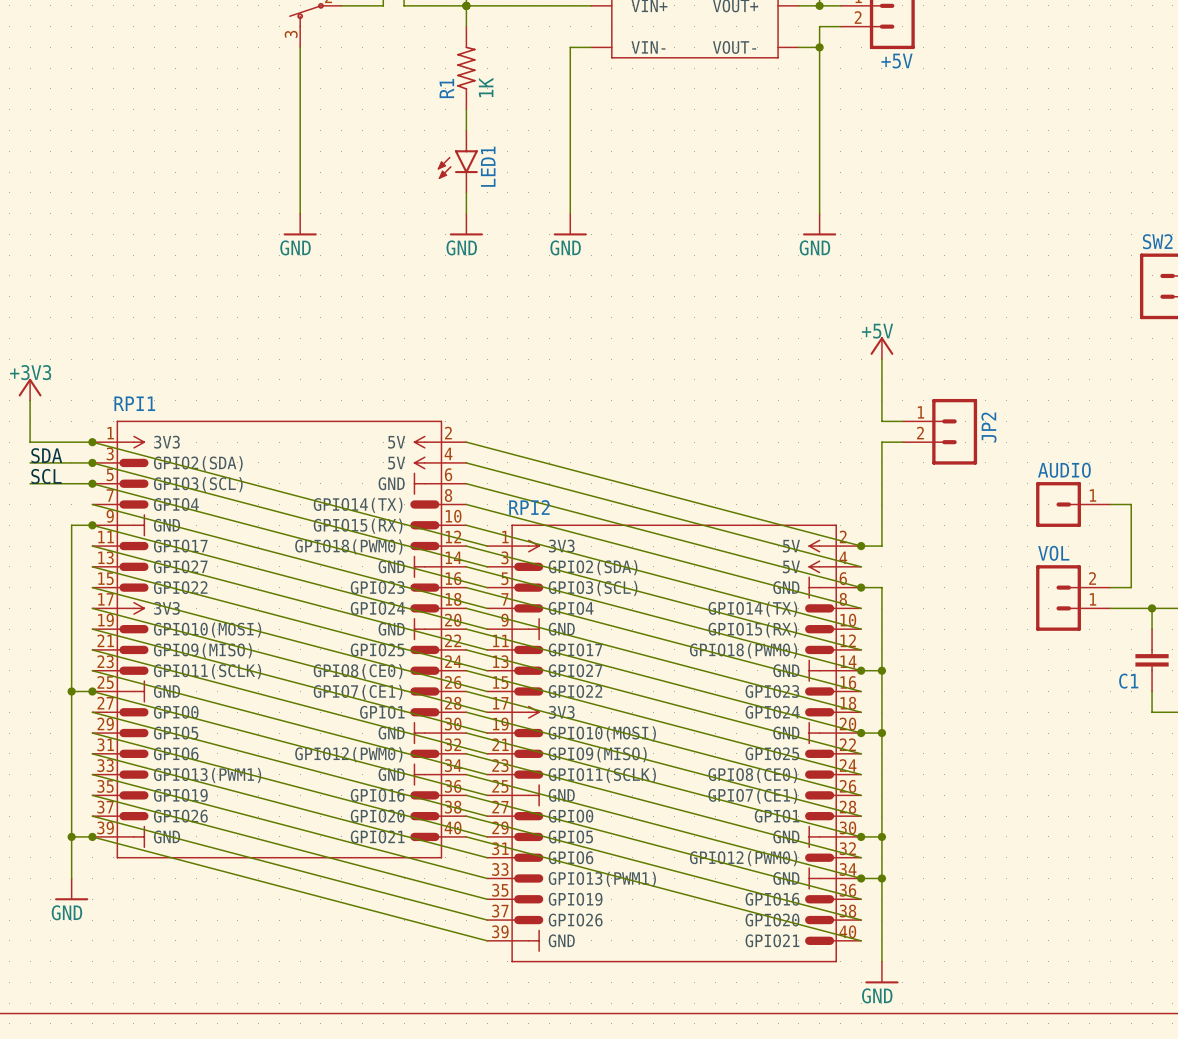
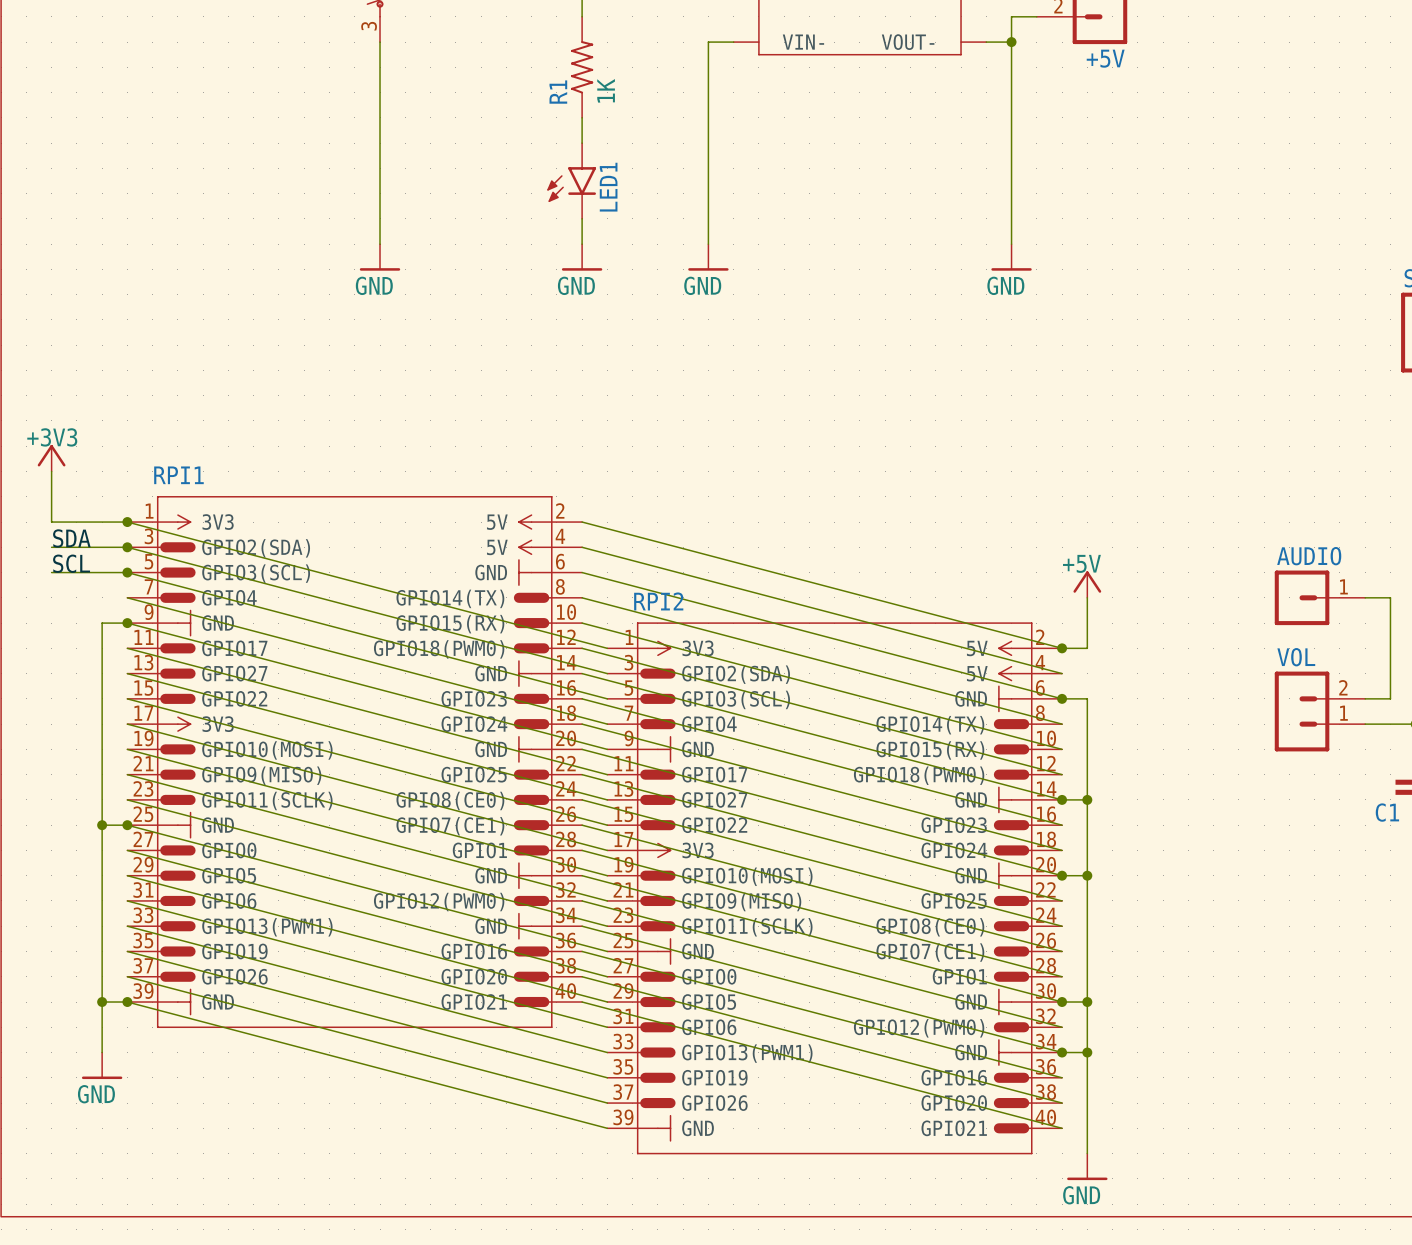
power symbol position: +5V (881, 348) -> +5V (1087, 584)
wire: (881, 359) (881, 421) (902, 421) -> none
JP2: (939, 431) -> none
wire: (902, 442) (881, 442) (881, 504) -> none

